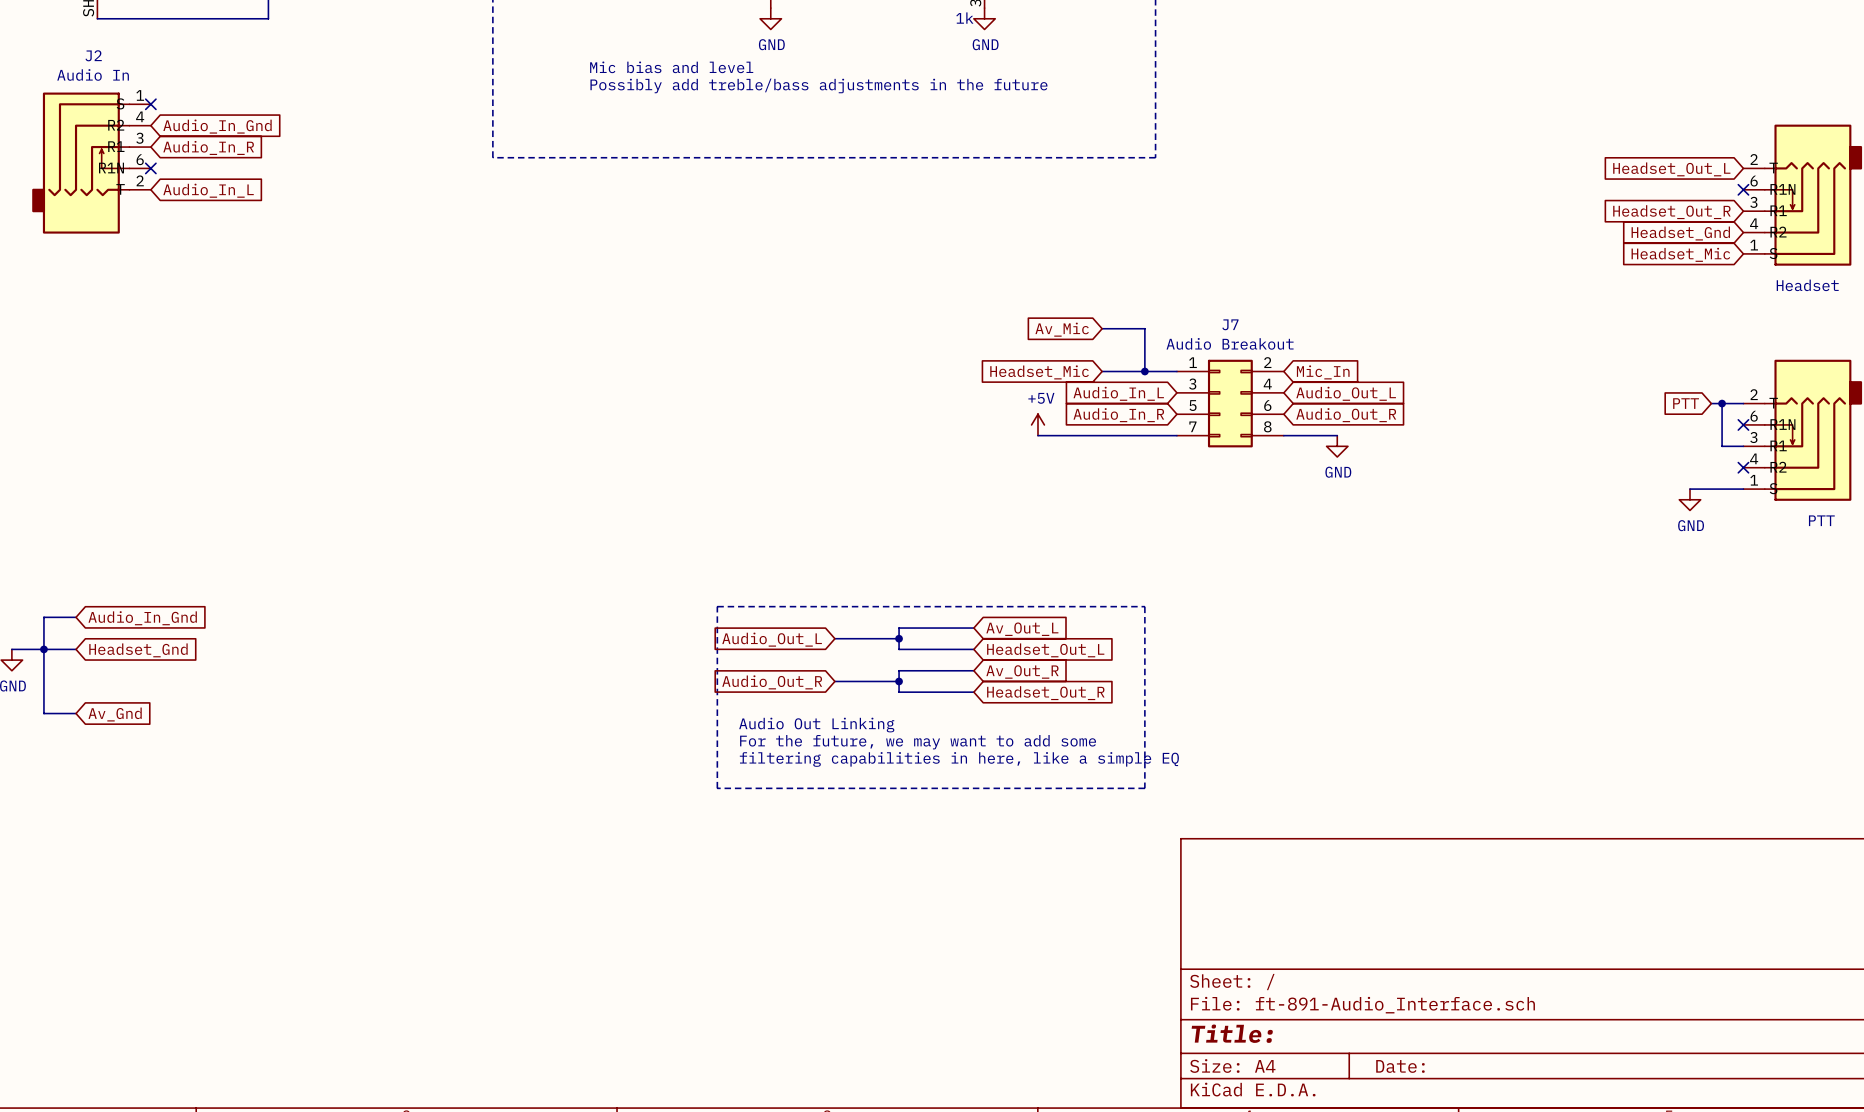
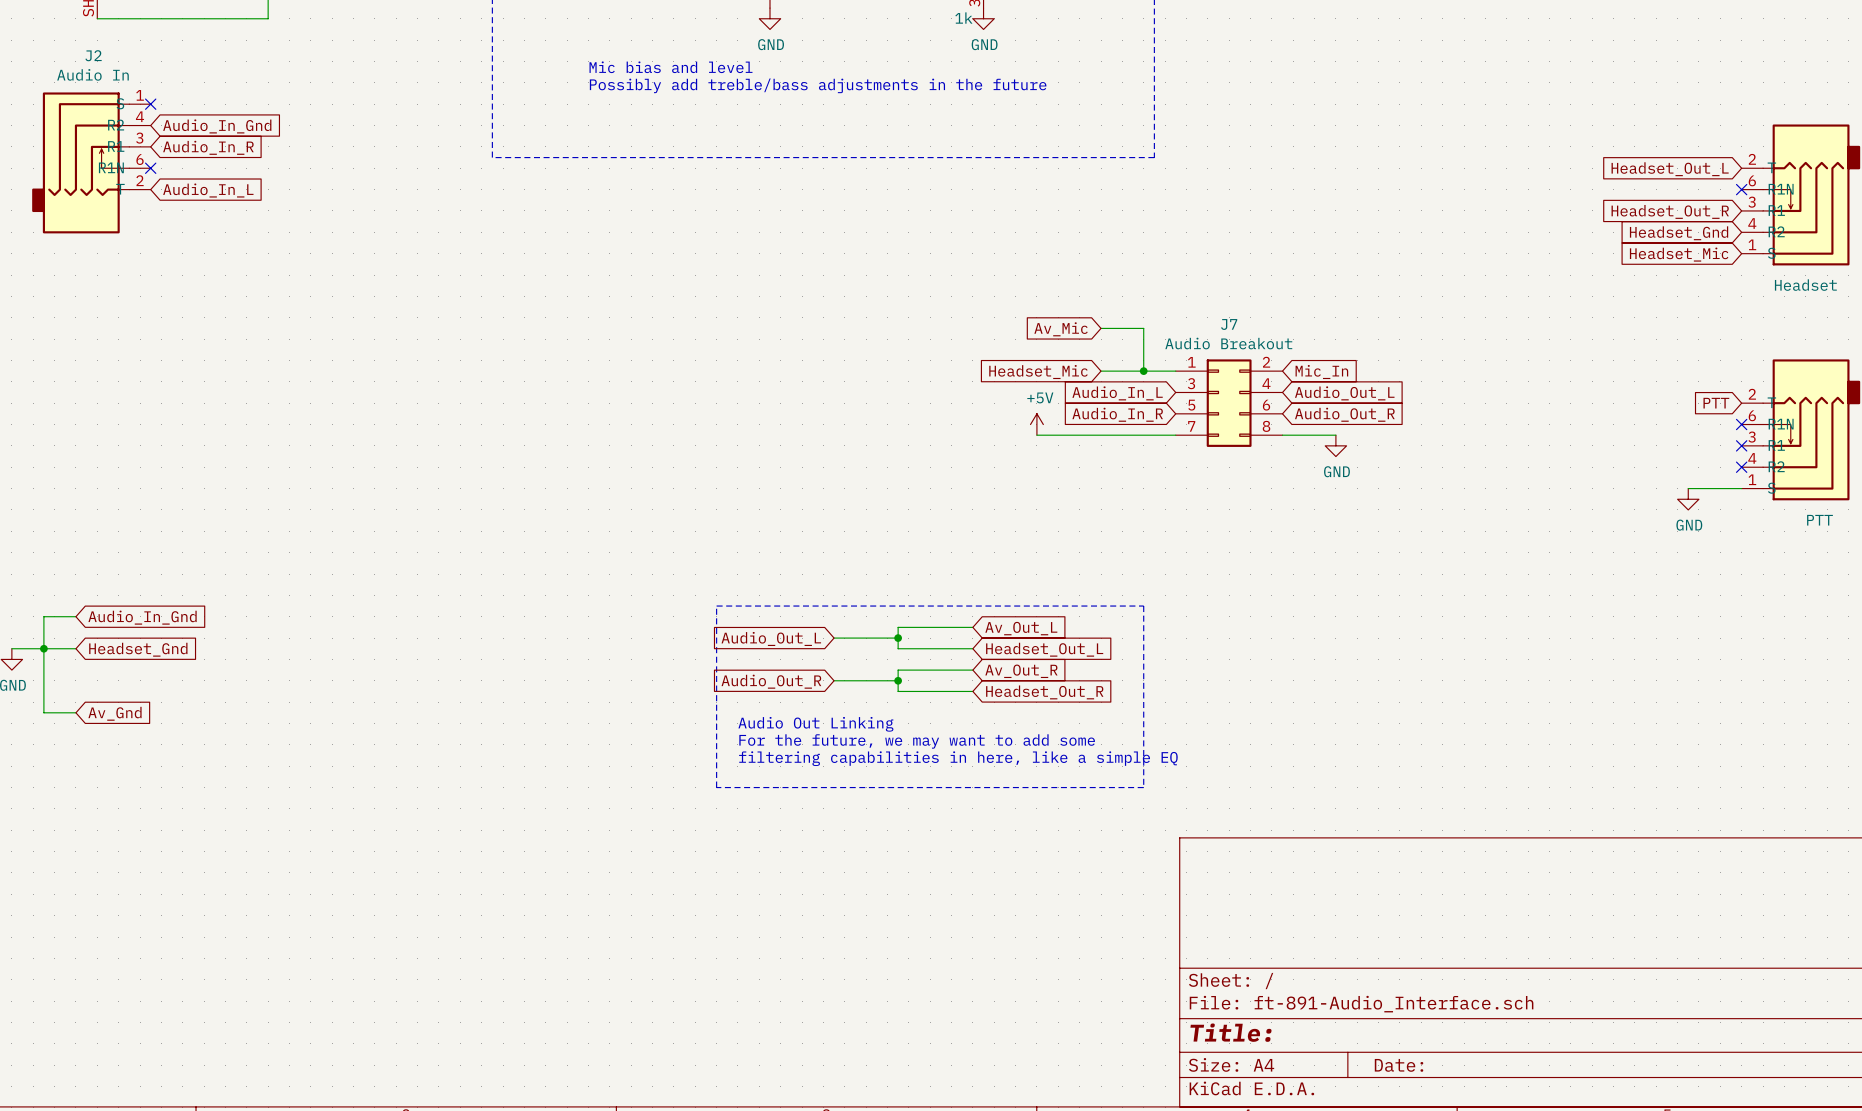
global label position: PTT (1686, 403) -> PTT (1716, 403)
wire: (1711, 403) (1743, 403) -> none
wire: (1722, 403) (1722, 446) (1743, 446) -> none
junction: (1722, 403) -> none
no-connect mark: none -> (1741, 445)

